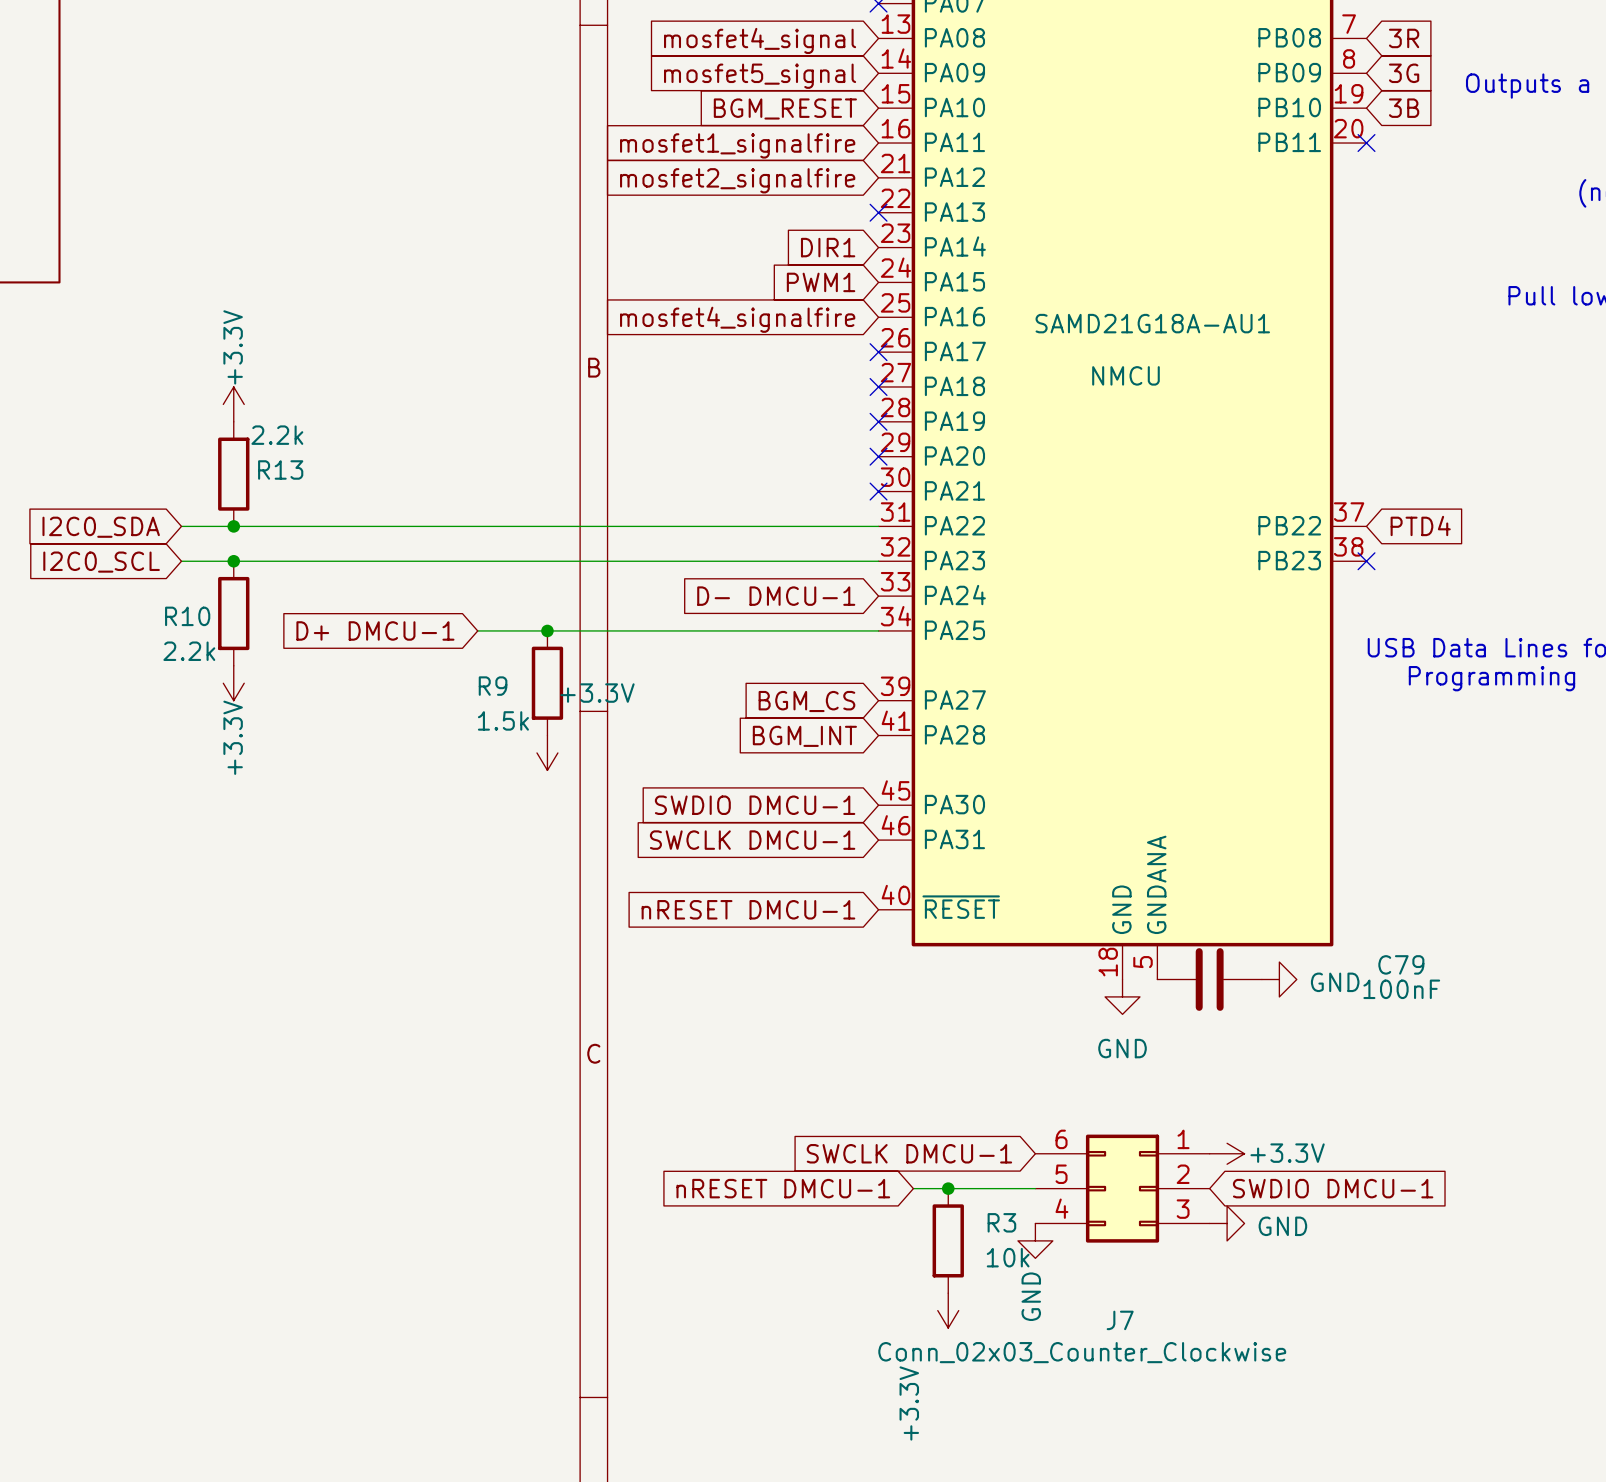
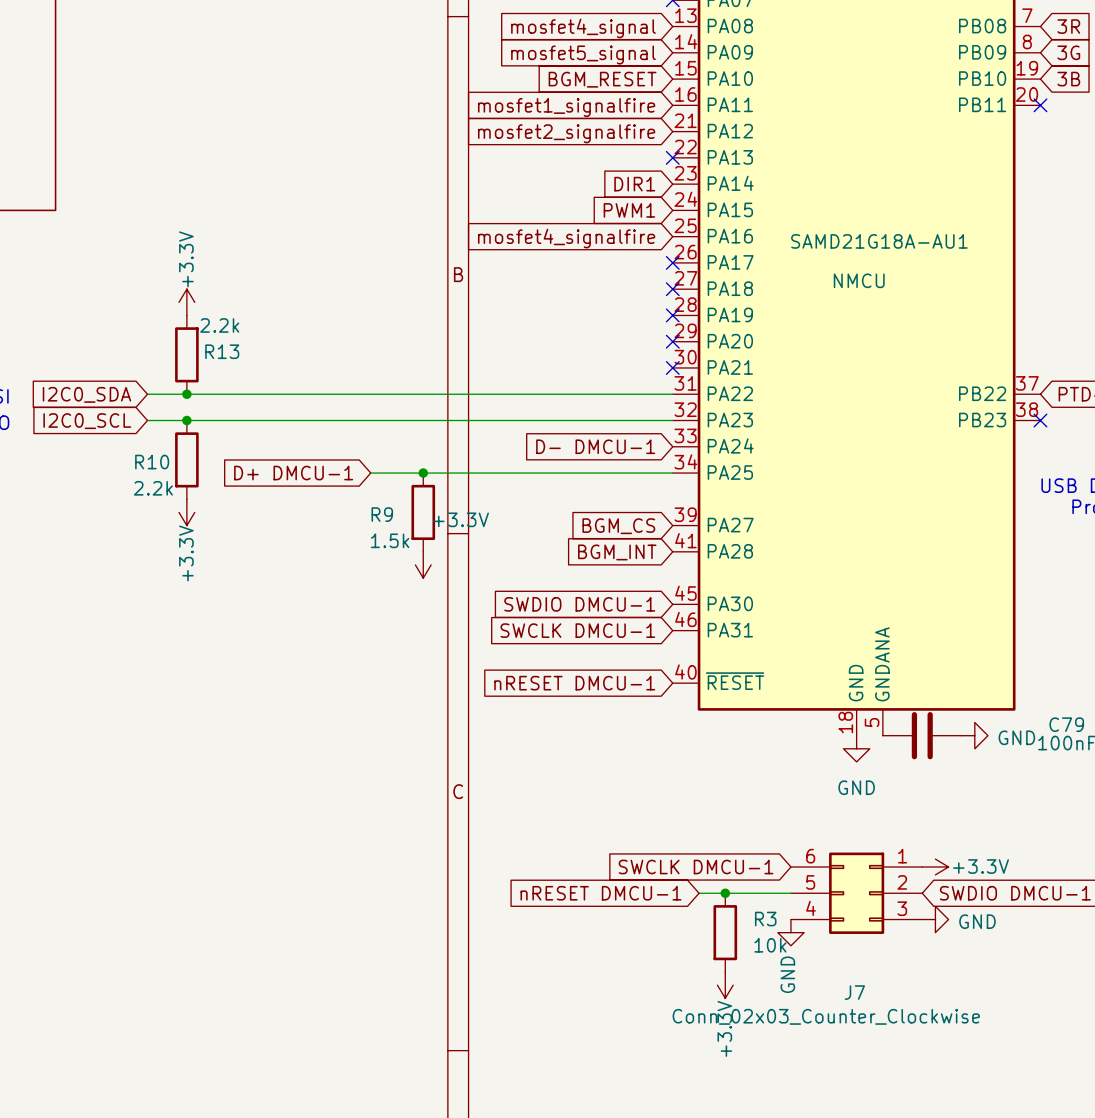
power symbol text position: +3.3V (909, 1403) -> +3.3V (724, 1028)

